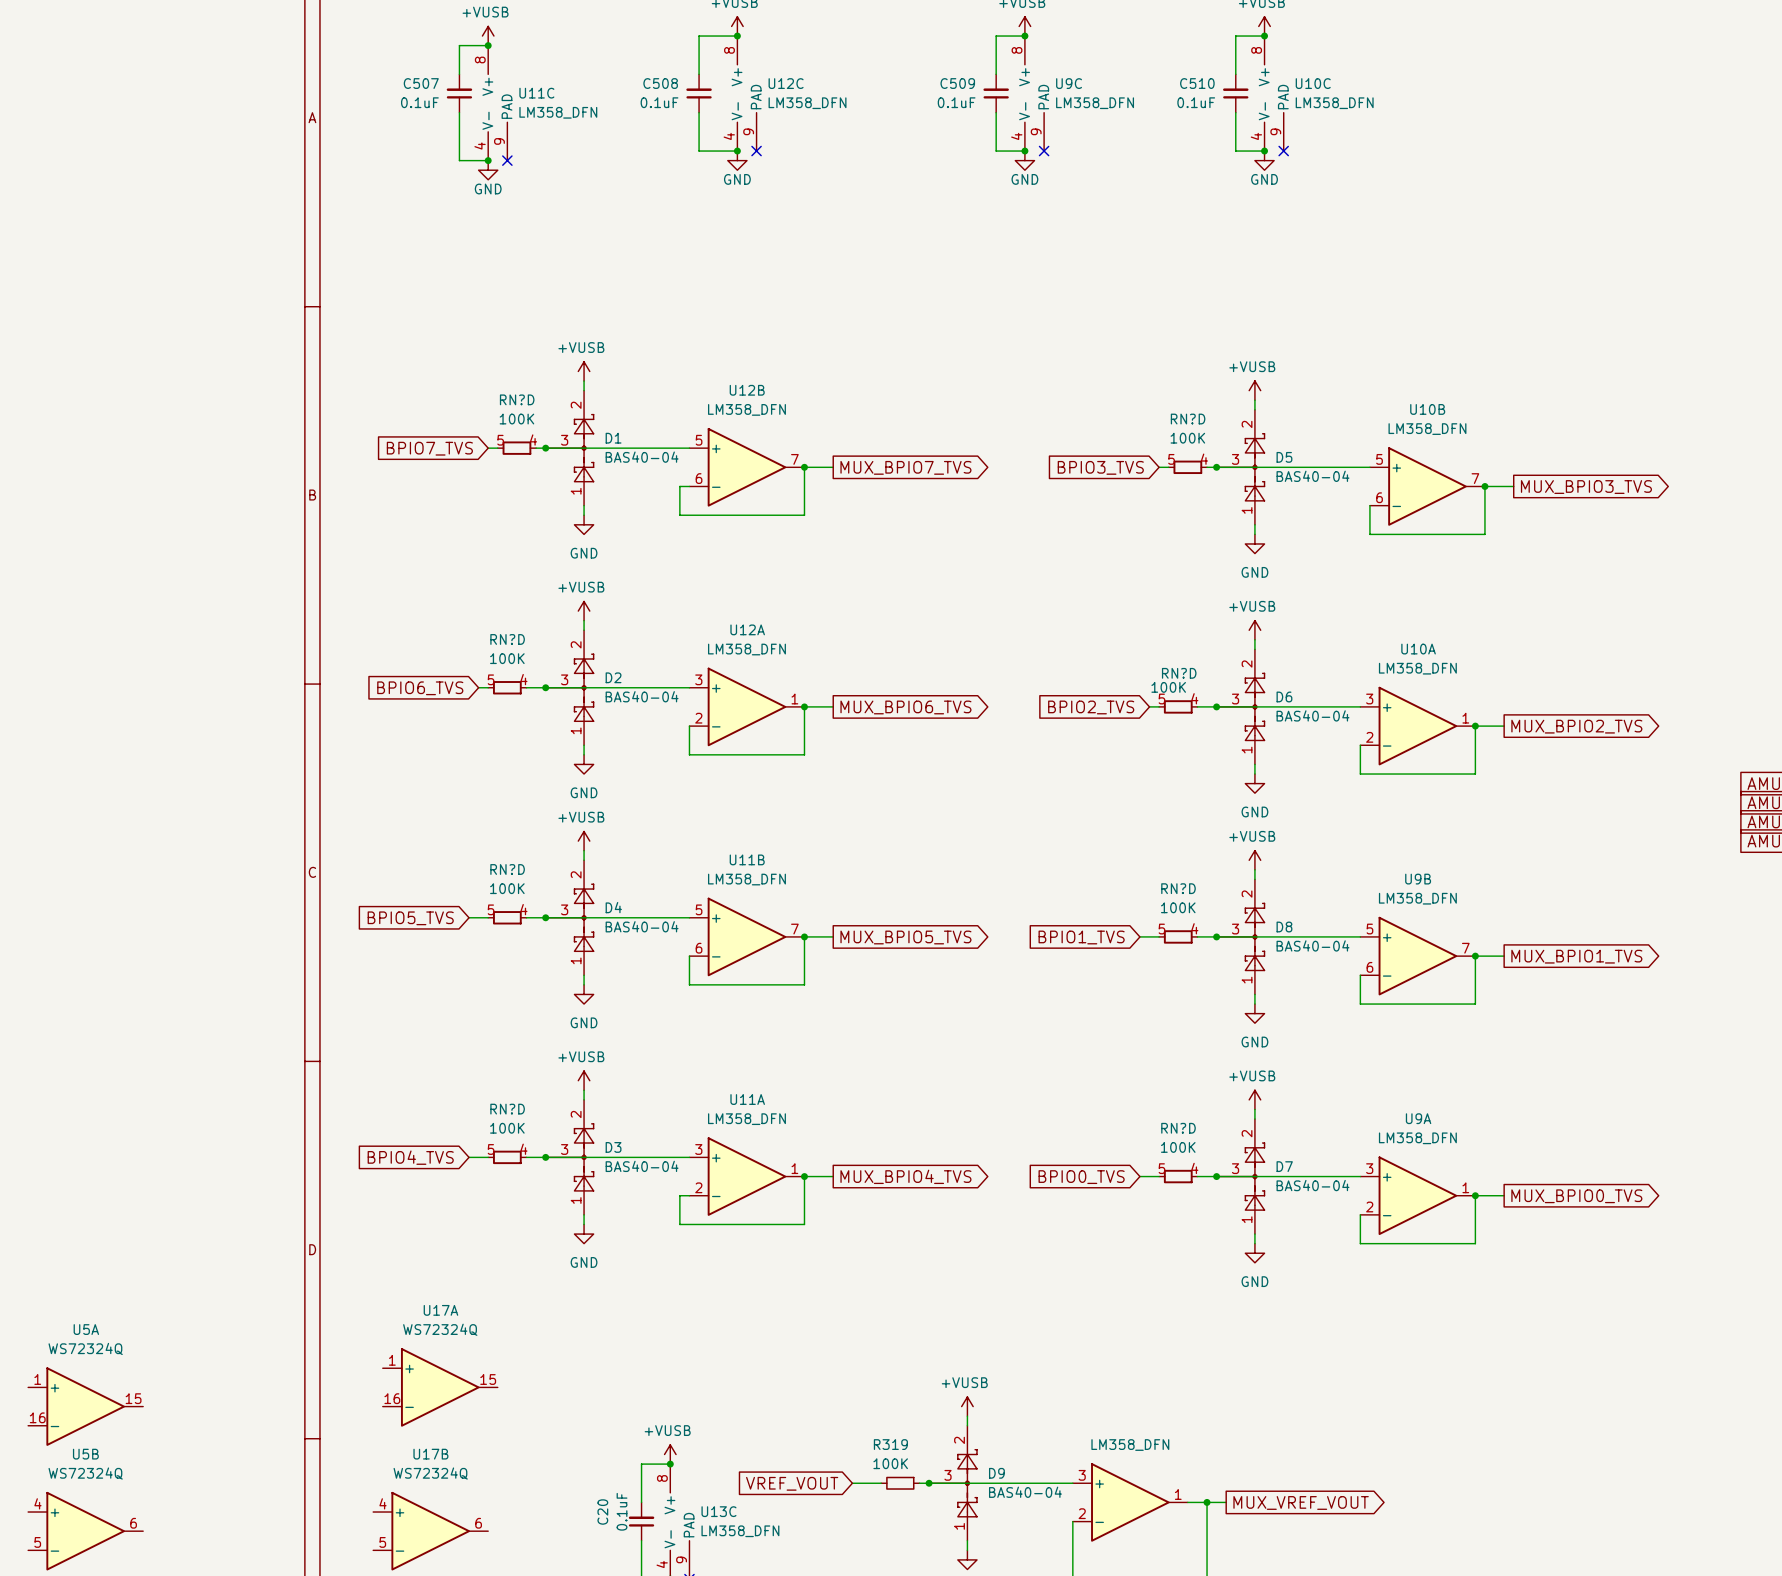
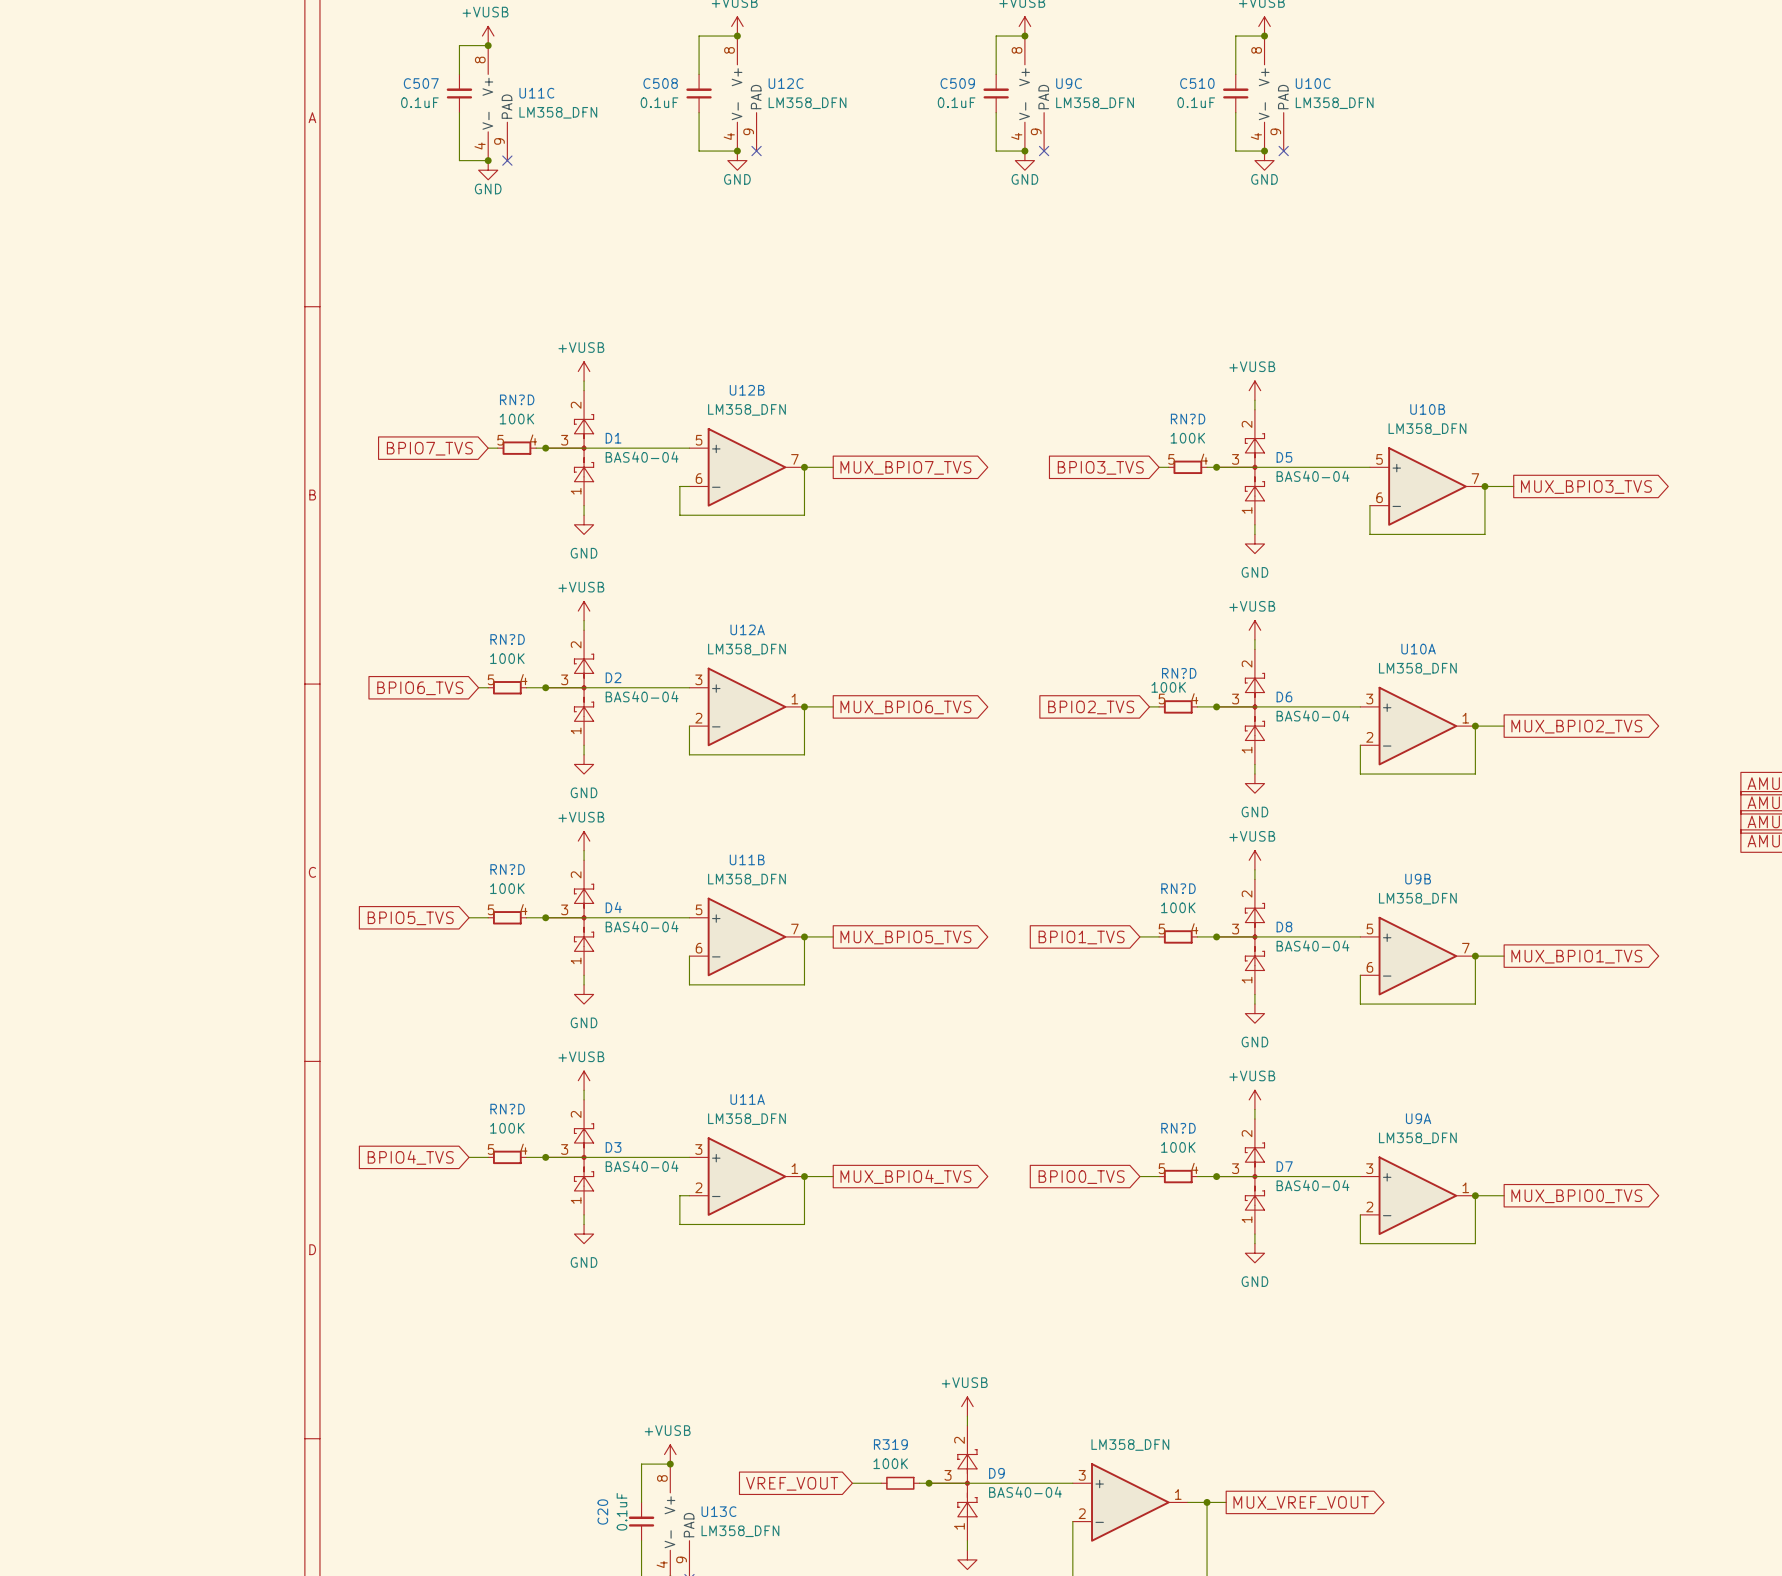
U17A: WS72324Q (440, 1387) -> none
U5A: WS72324Q (85, 1406) -> none
U5B: WS72324Q (85, 1531) -> none
U17B: WS72324Q (430, 1531) -> none

